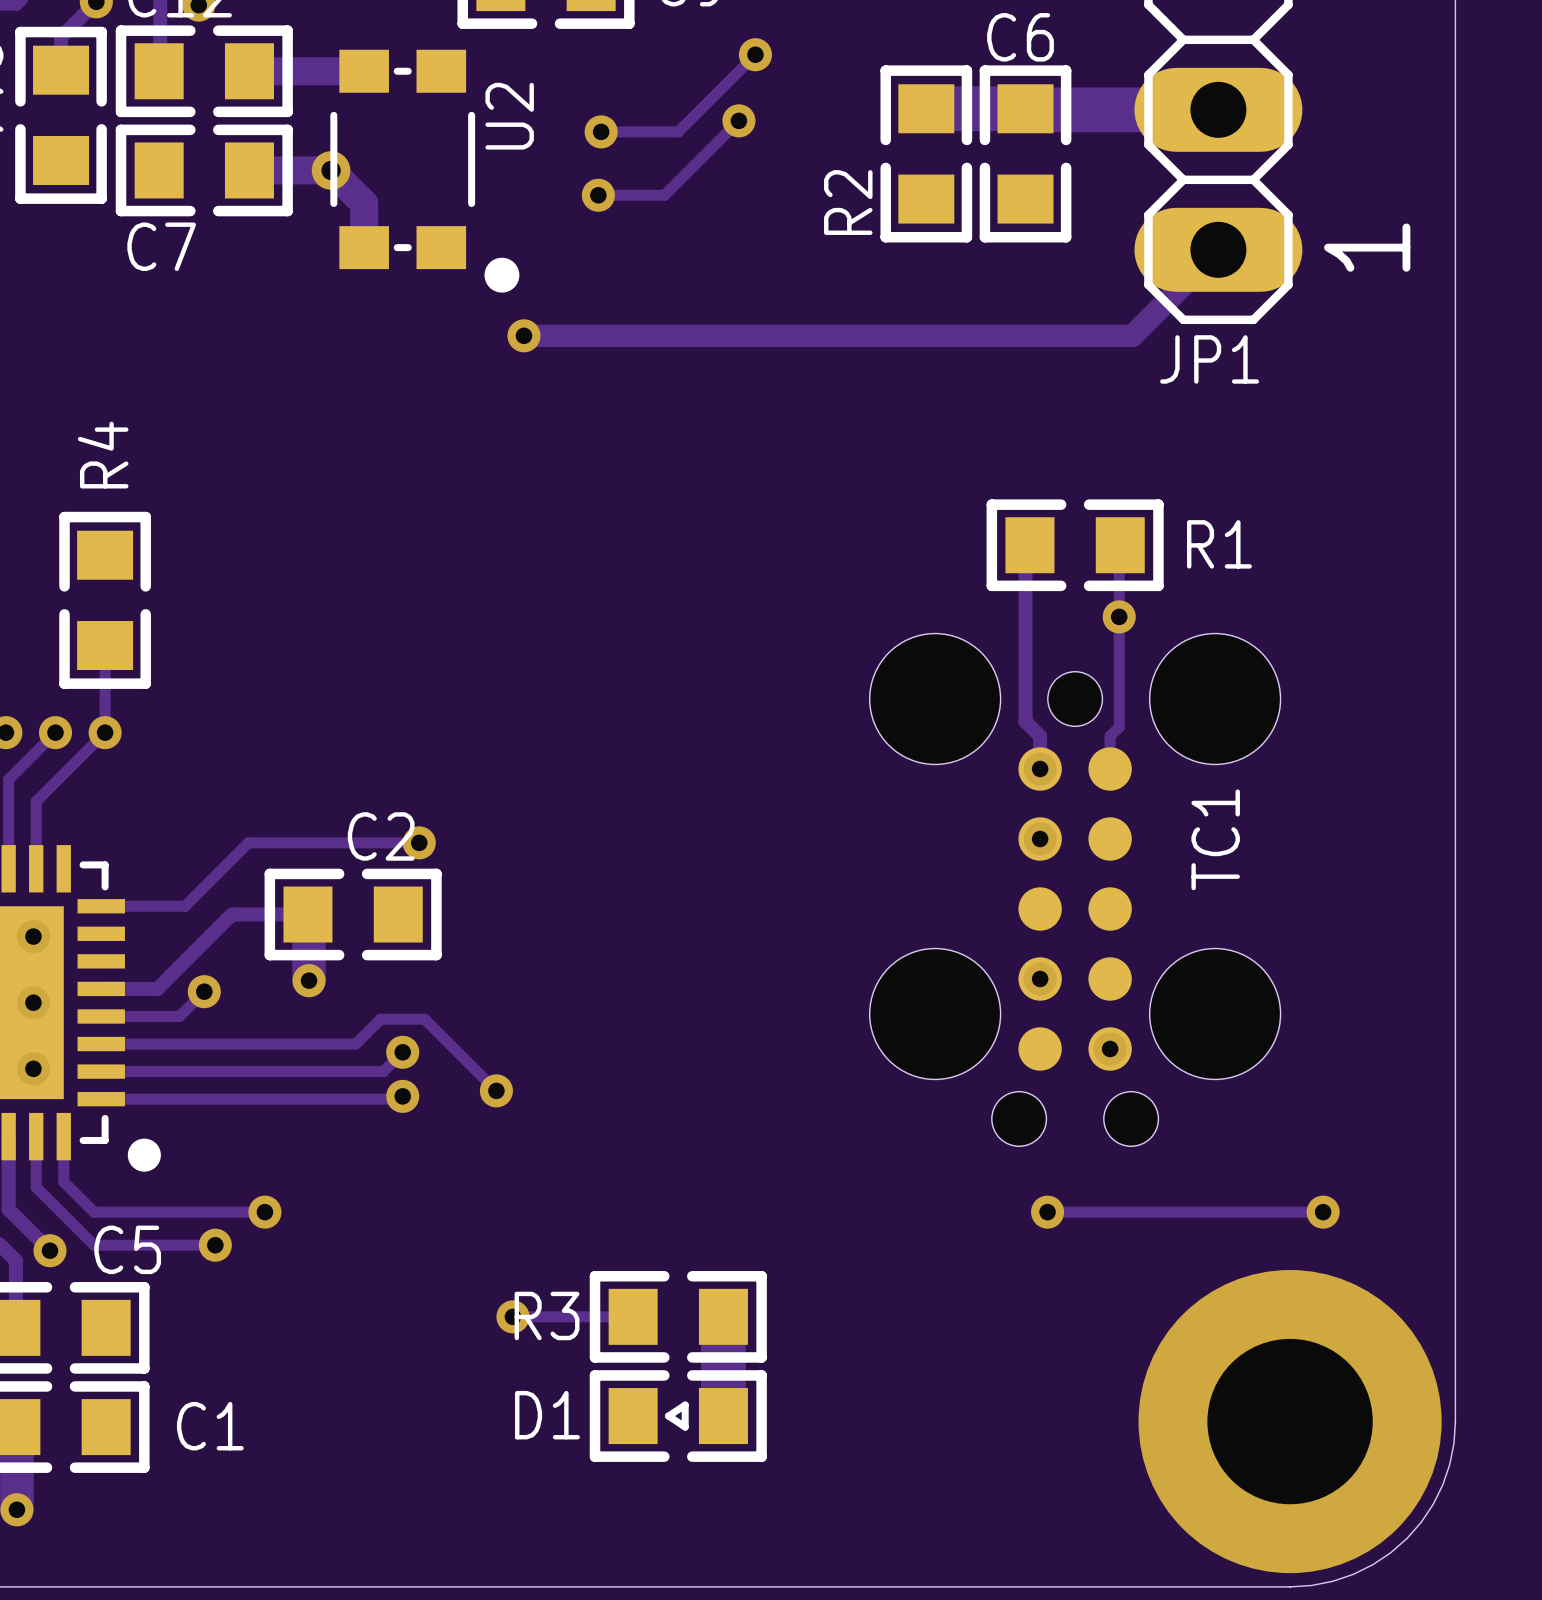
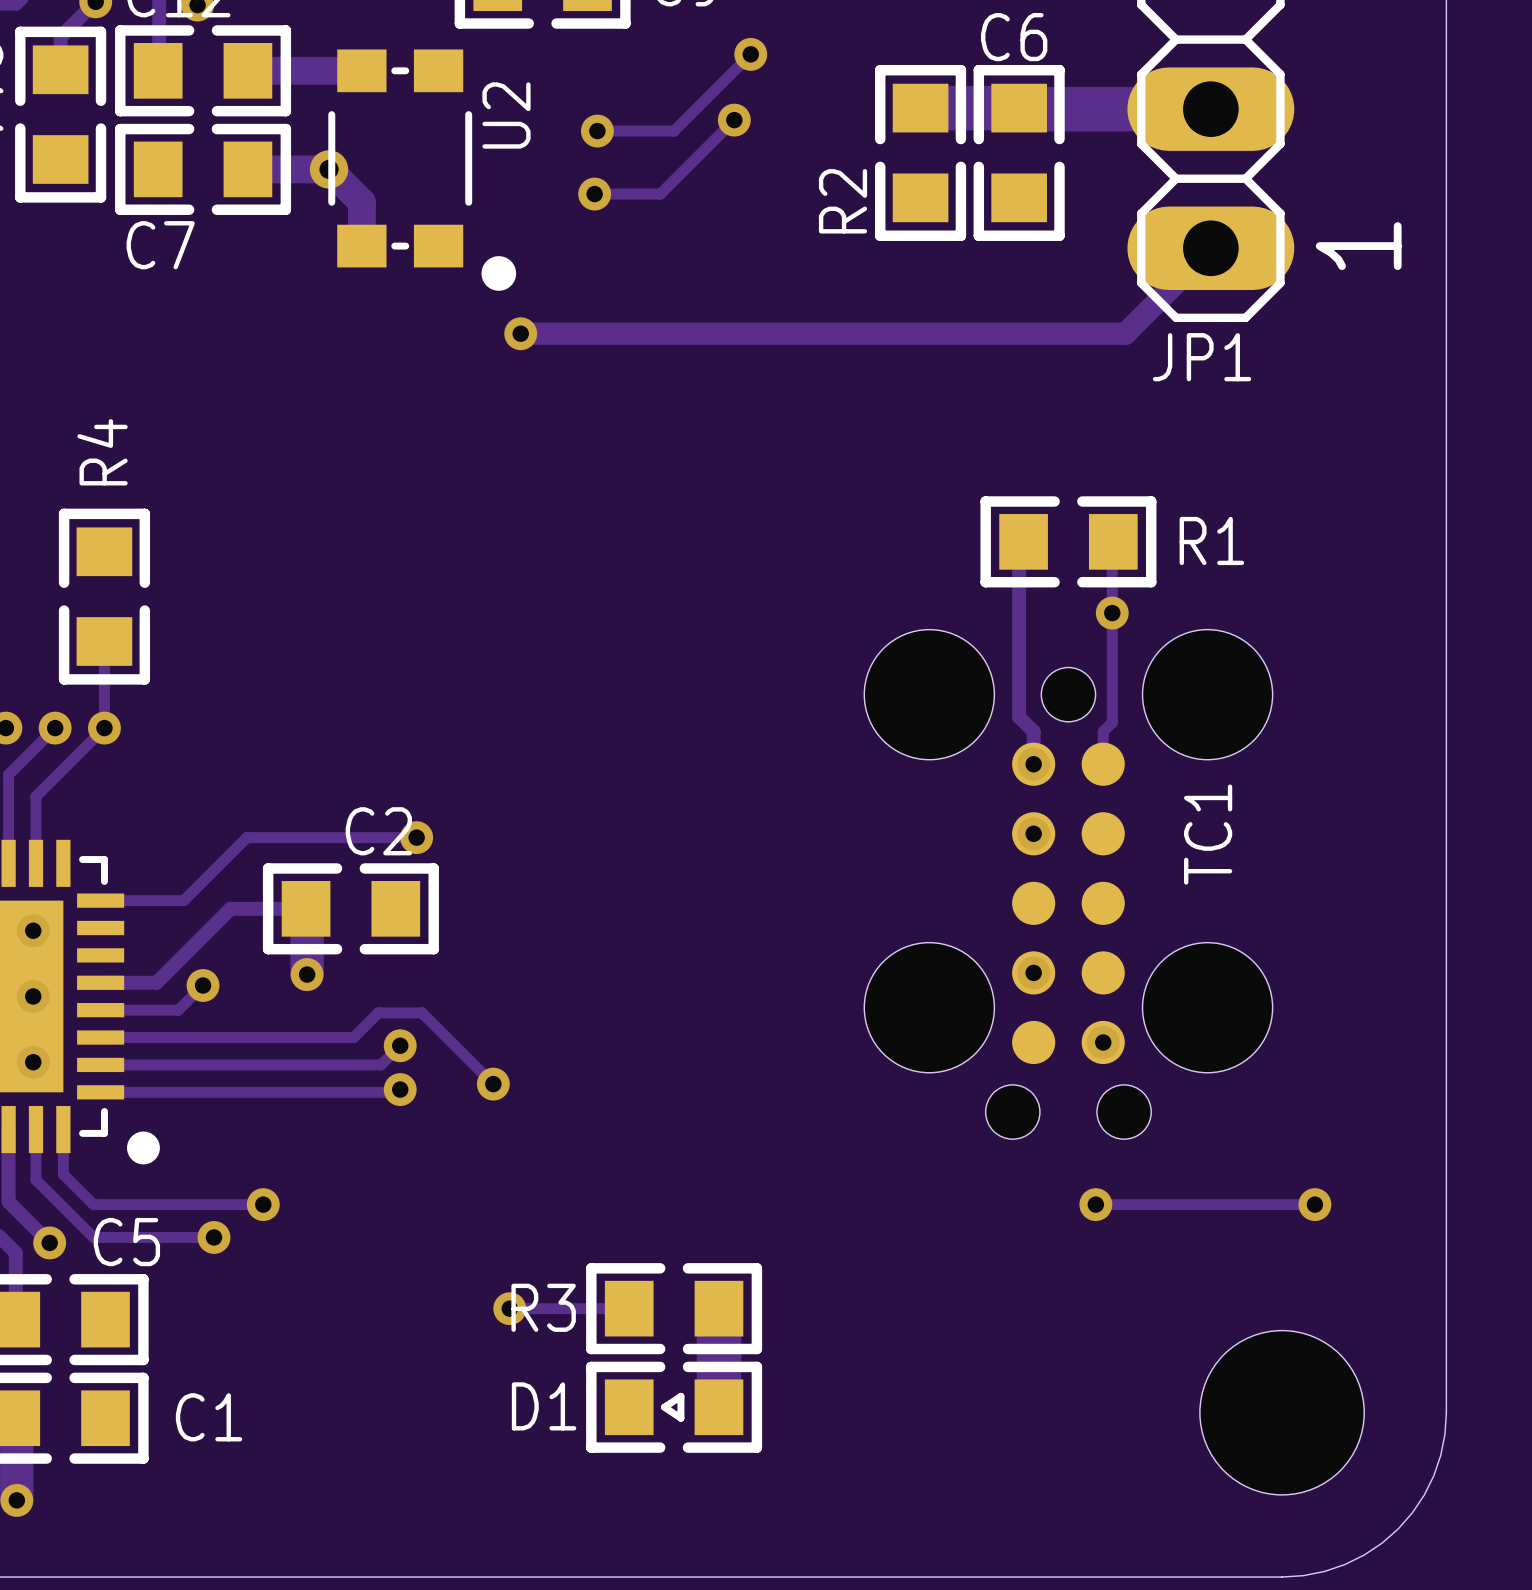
track: (1047, 1212) (1102, 1212) -> none
via position: (1047, 1212) -> (1095, 1204)
via: (1290, 1421) -> none
hole: none -> (1282, 1412)

